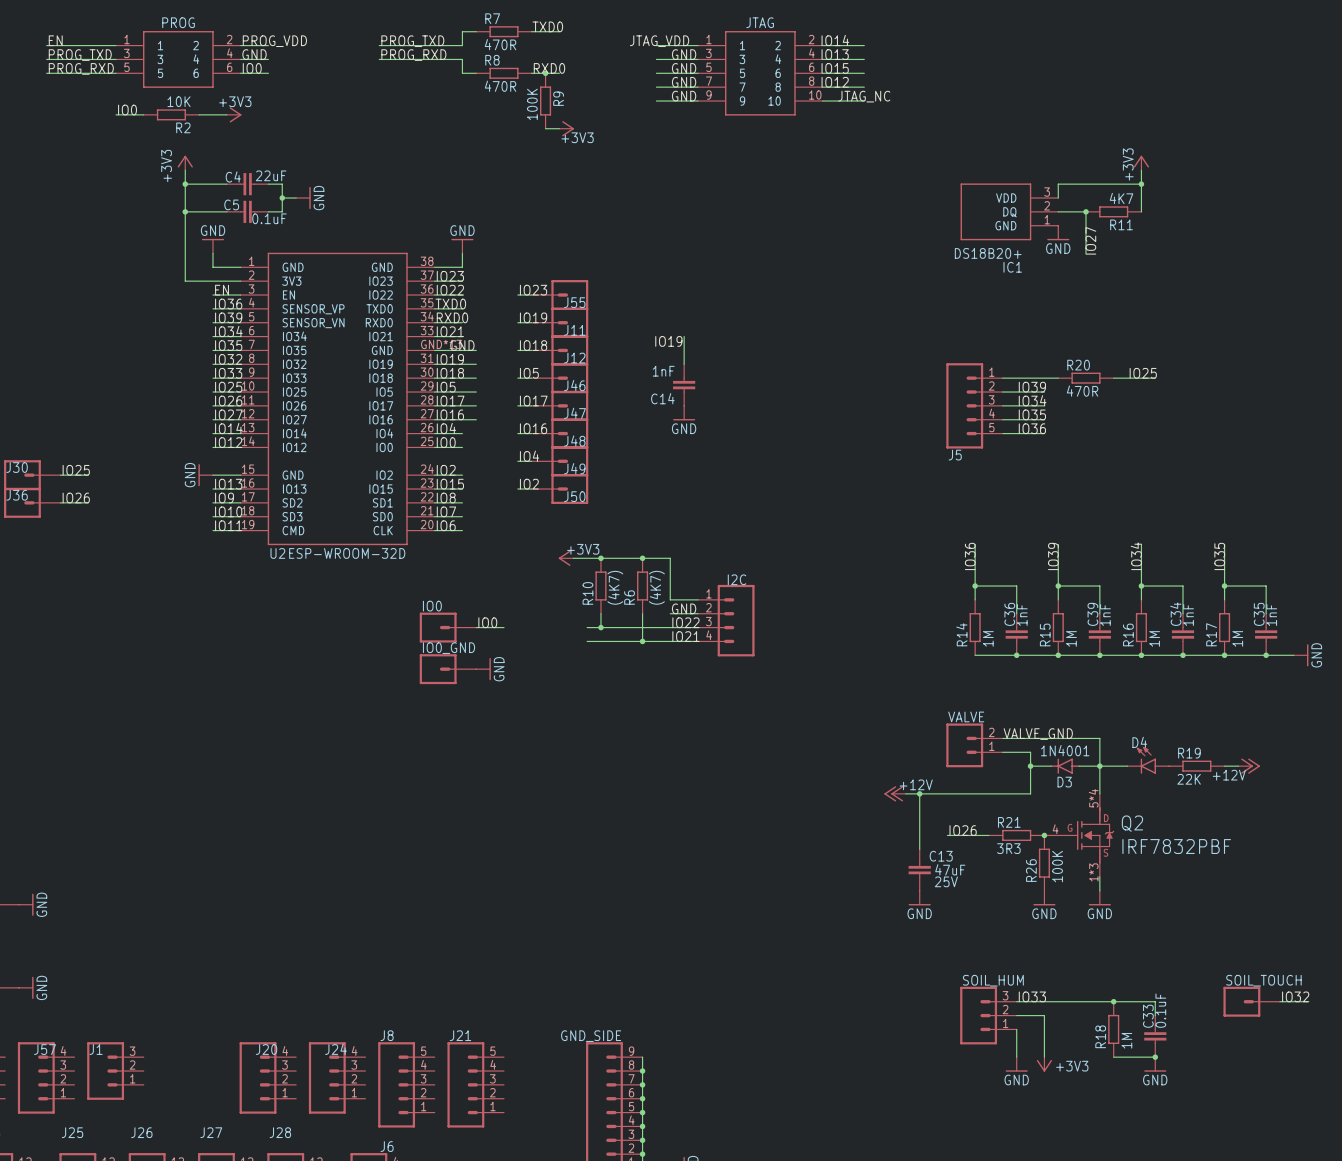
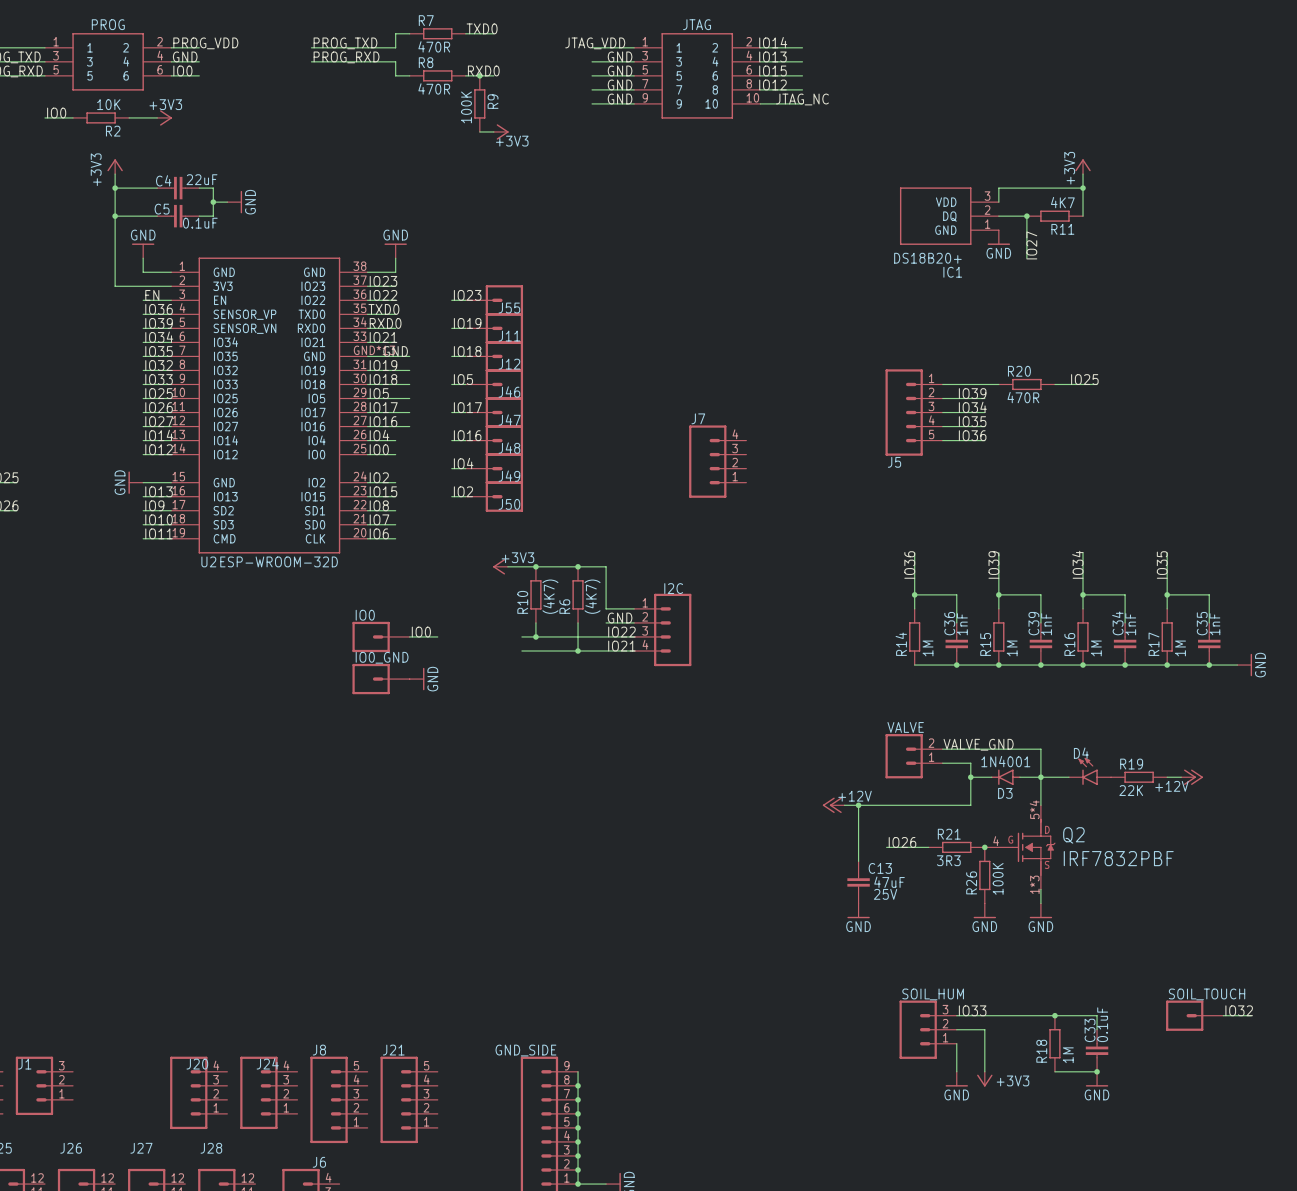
wire: (684, 336) (684, 364) -> none
label: IO19 (668, 341) -> none
C14: 1nF (684, 385) -> none
power symbol: GND (684, 413) -> none
J7: none -> (717, 461)

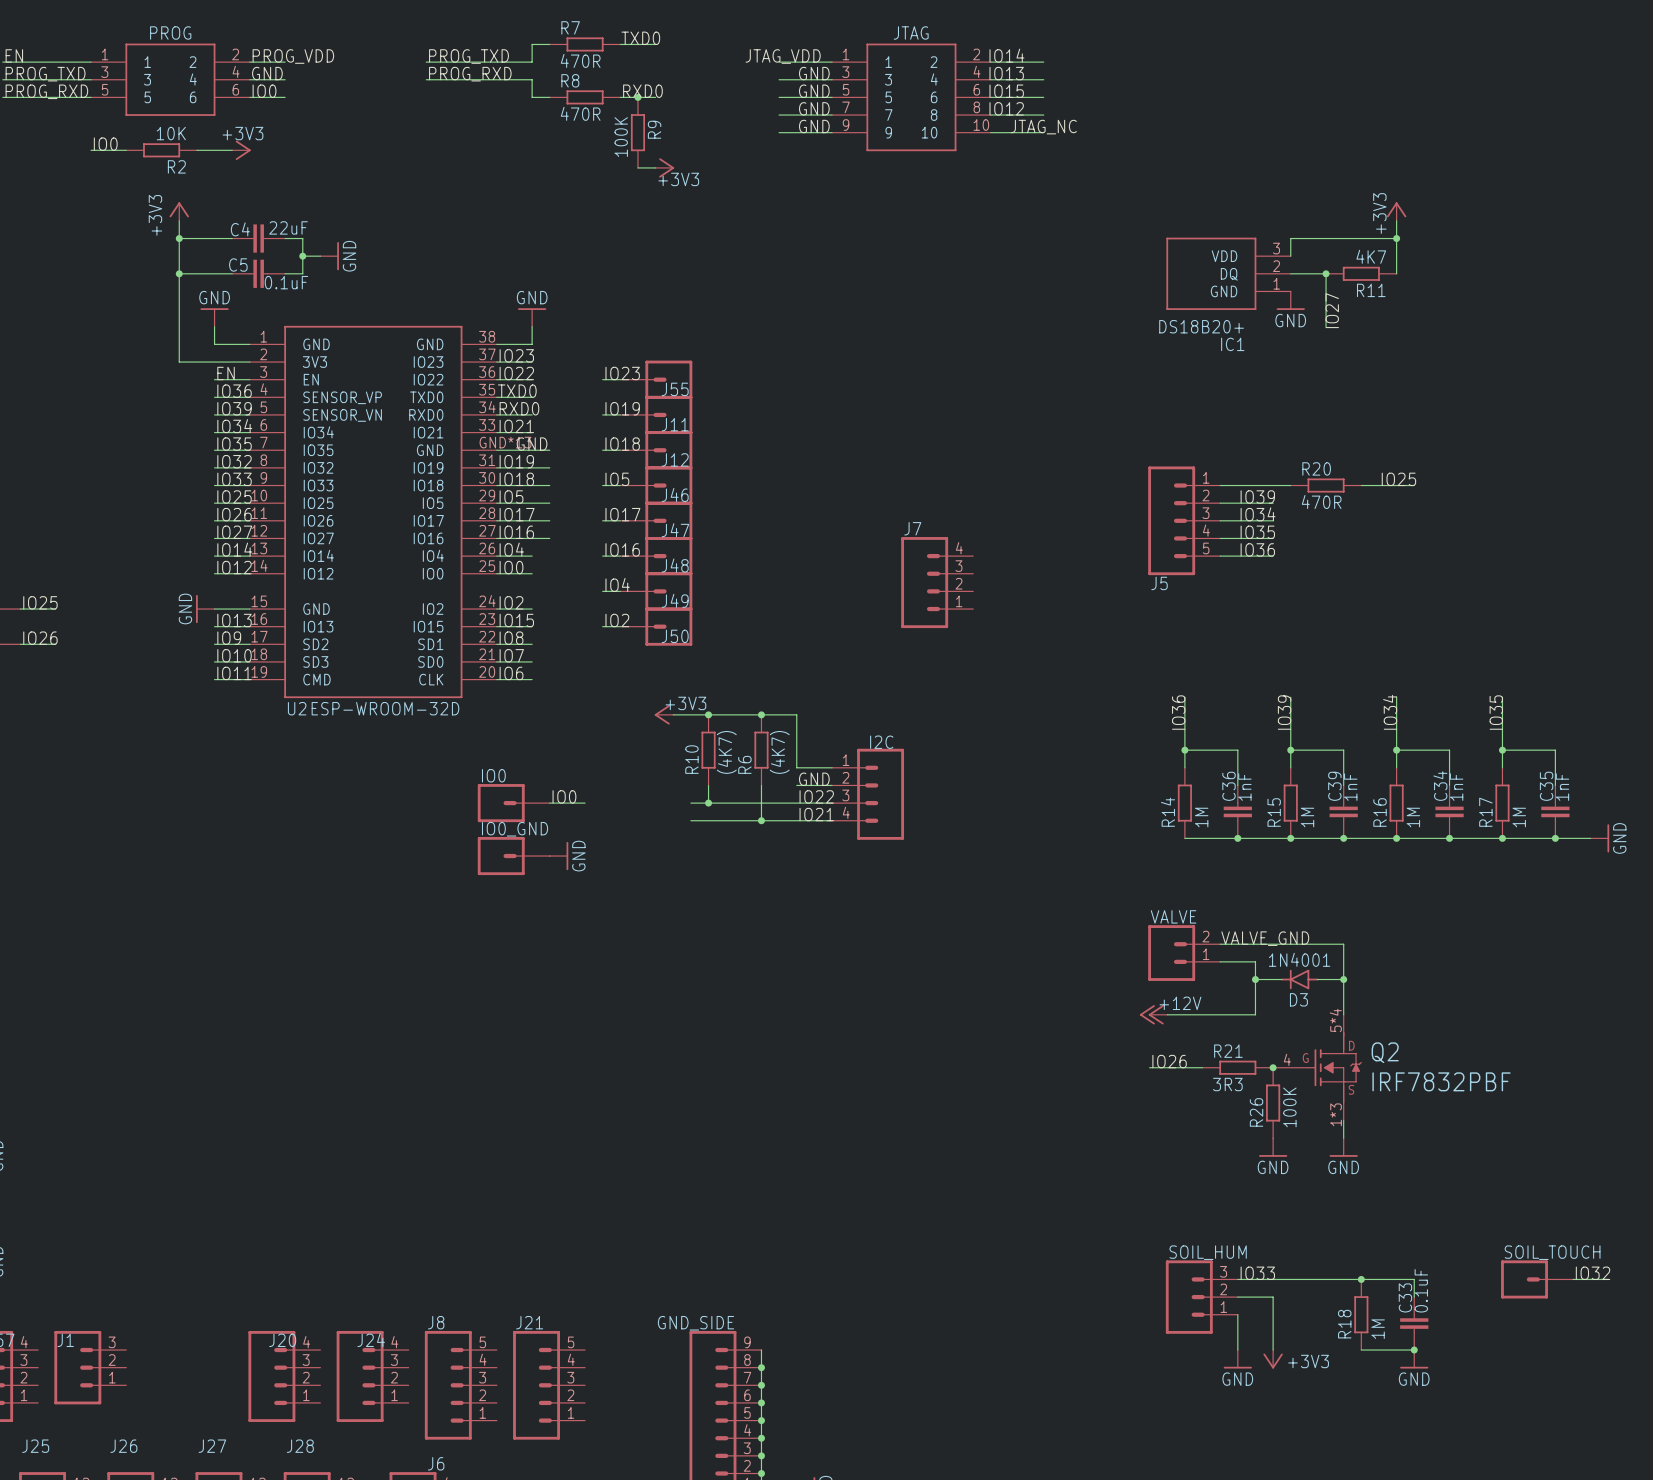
D4: (1090, 771) -> none
wire: (1040, 777) (1068, 777) -> none
R19: 22K (1139, 777) -> none
wire: (1167, 777) (1181, 777) -> none
power symbol: +12V (1192, 777) -> none
power symbol position: +12V (833, 805) -> +12V (1153, 1014)
wire: (844, 805) (900, 805) -> none
wire: (858, 805) (858, 861) -> none
junction: (858, 805) -> none
C13: 47uF (858, 882) -> none
power symbol: GND (858, 910) -> none

